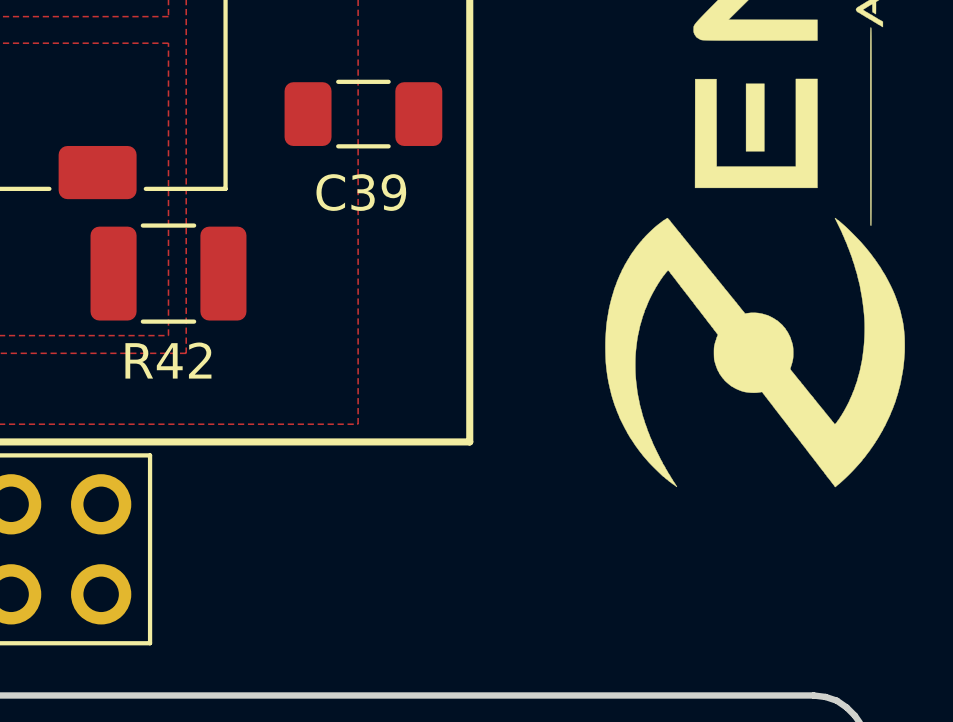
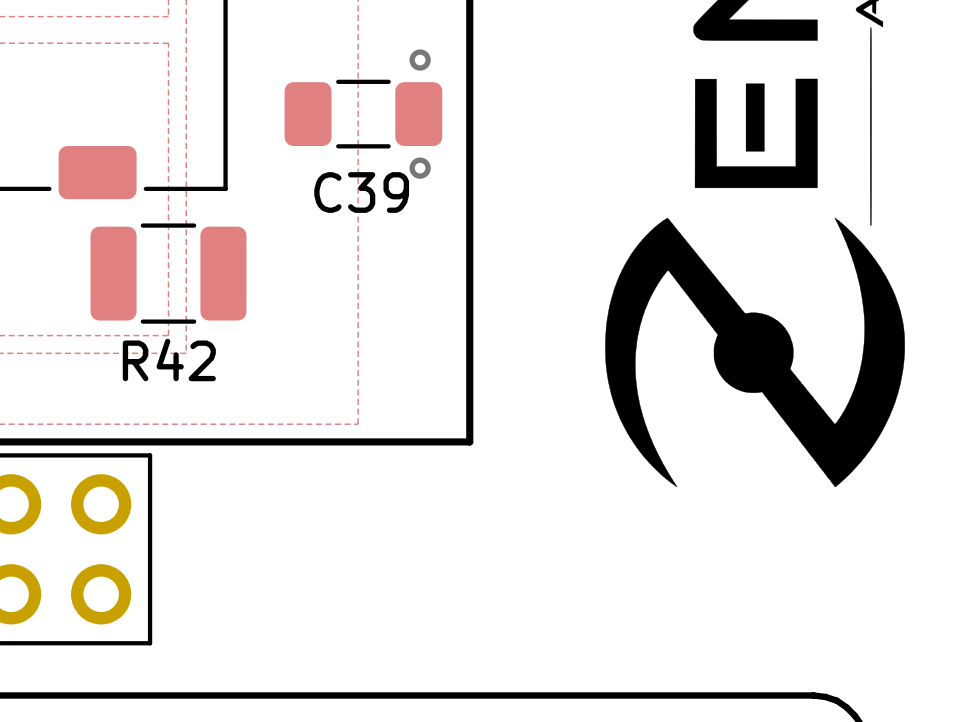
via: none -> (420, 60)
via: none -> (420, 168)

